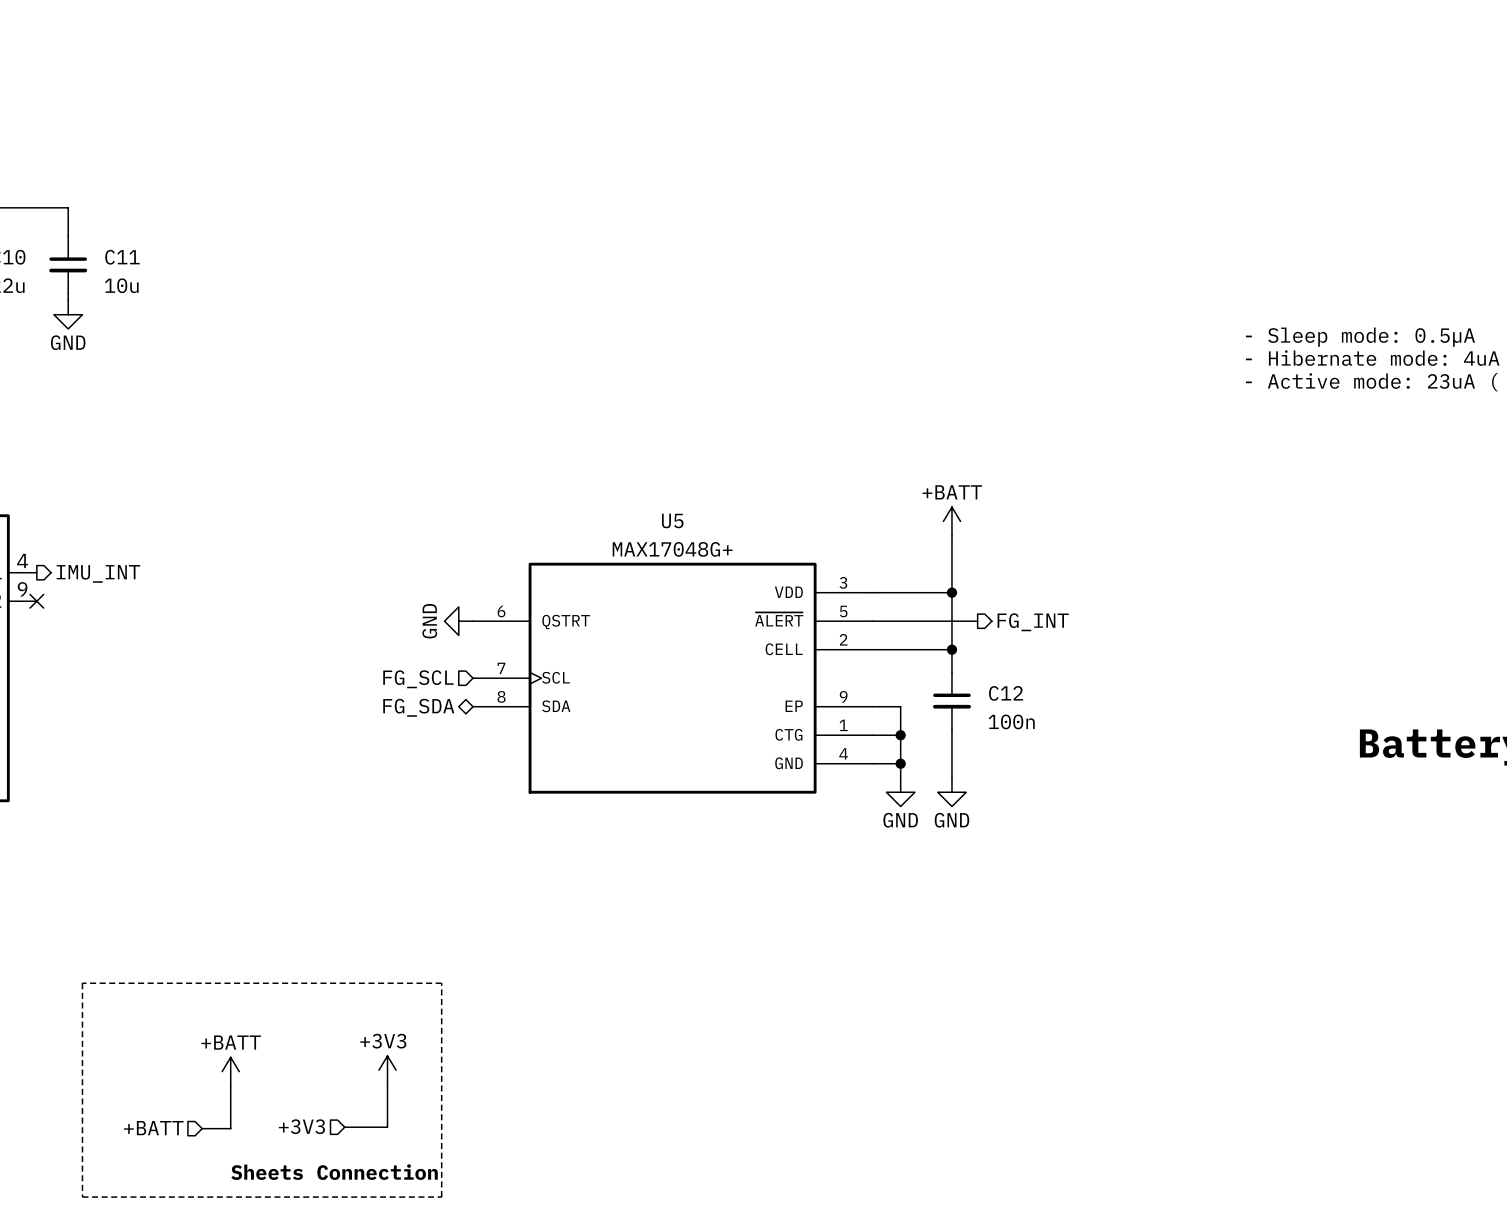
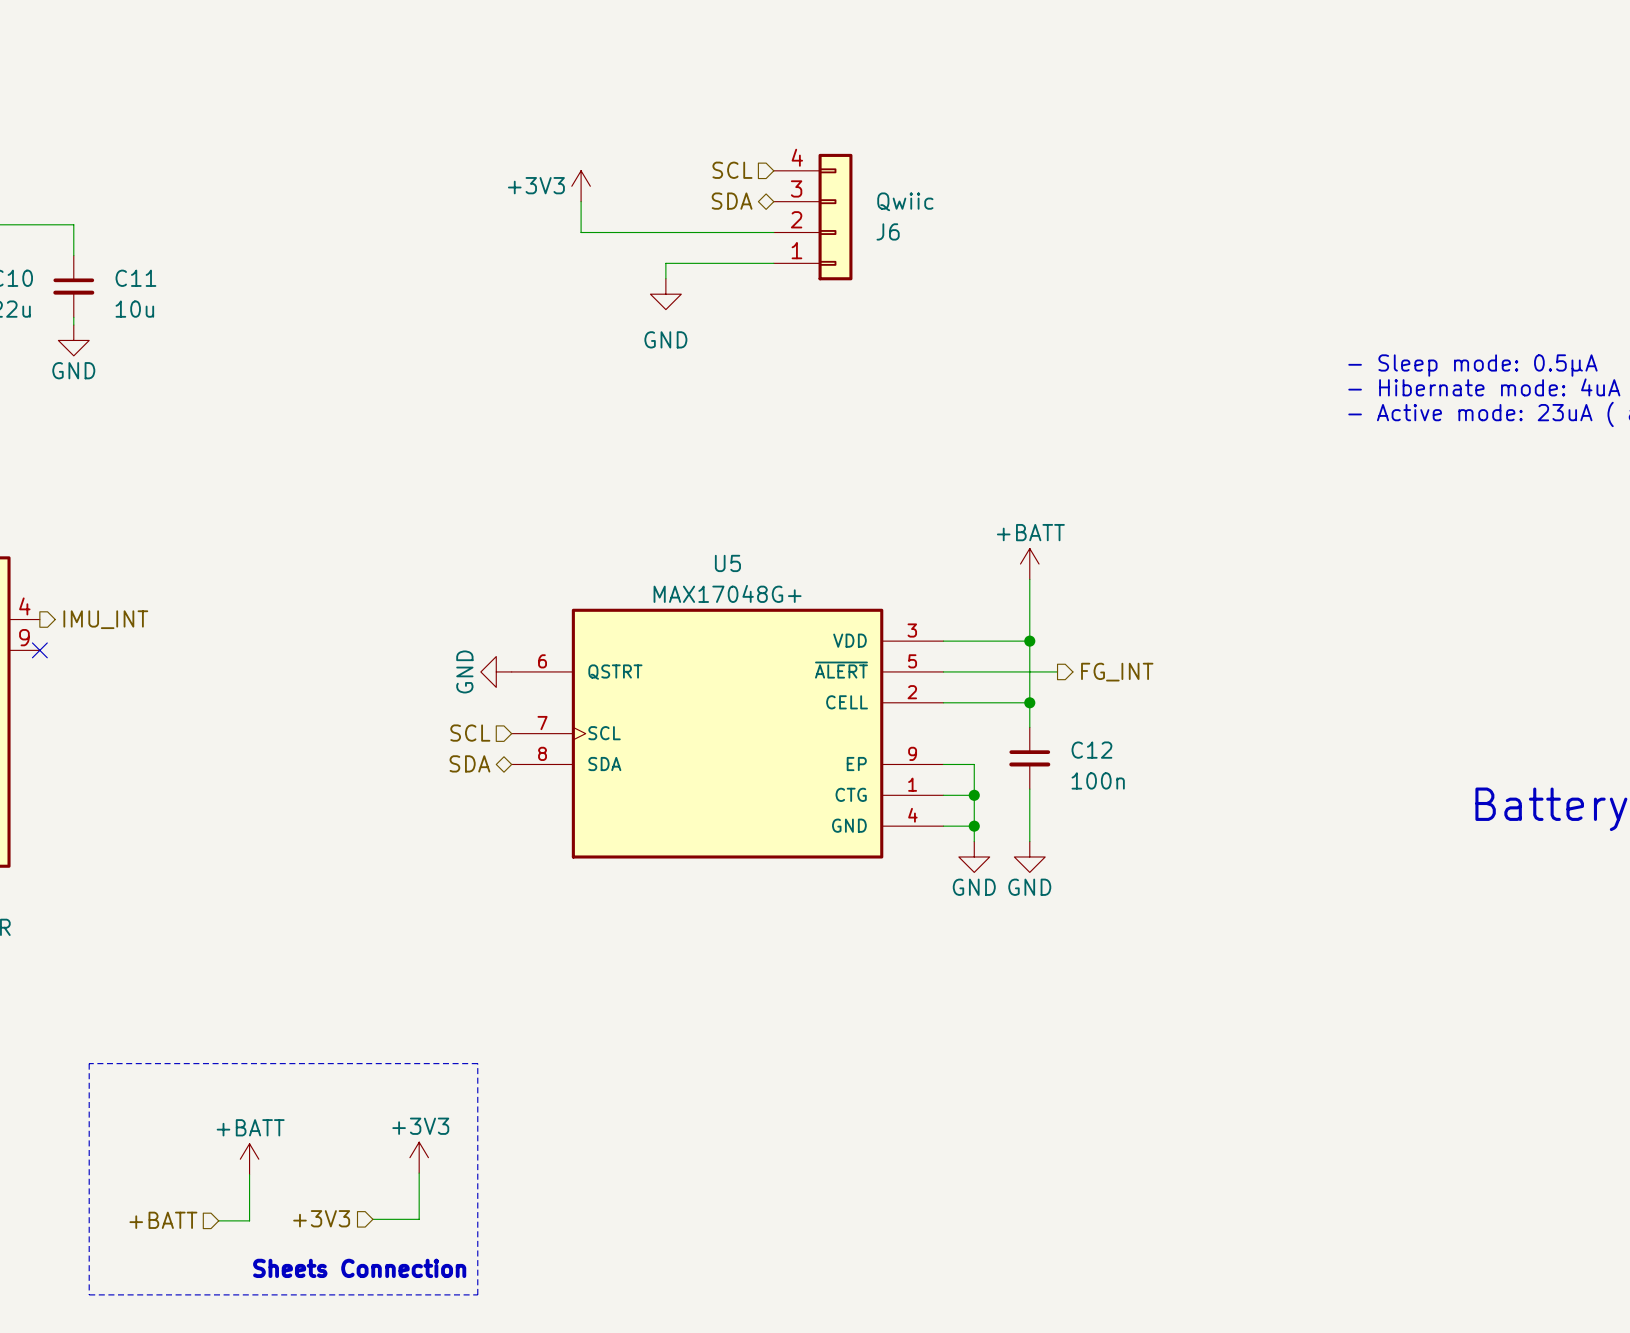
hierarchical label: none -> SCL (732, 170)
power symbol: none -> +3V3 (581, 186)
hierarchical label: none -> SDA (732, 201)
wire: none -> (581, 201) (581, 232) (773, 232)
J6: none -> Qwiic (813, 217)
wire: none -> (773, 263) (665, 263) (665, 278)
power symbol: none -> GND (665, 294)
hierarchical label: FG_SCL (418, 679) -> SCL (470, 733)
hierarchical label: FG_SDA (418, 707) -> SDA (469, 763)

